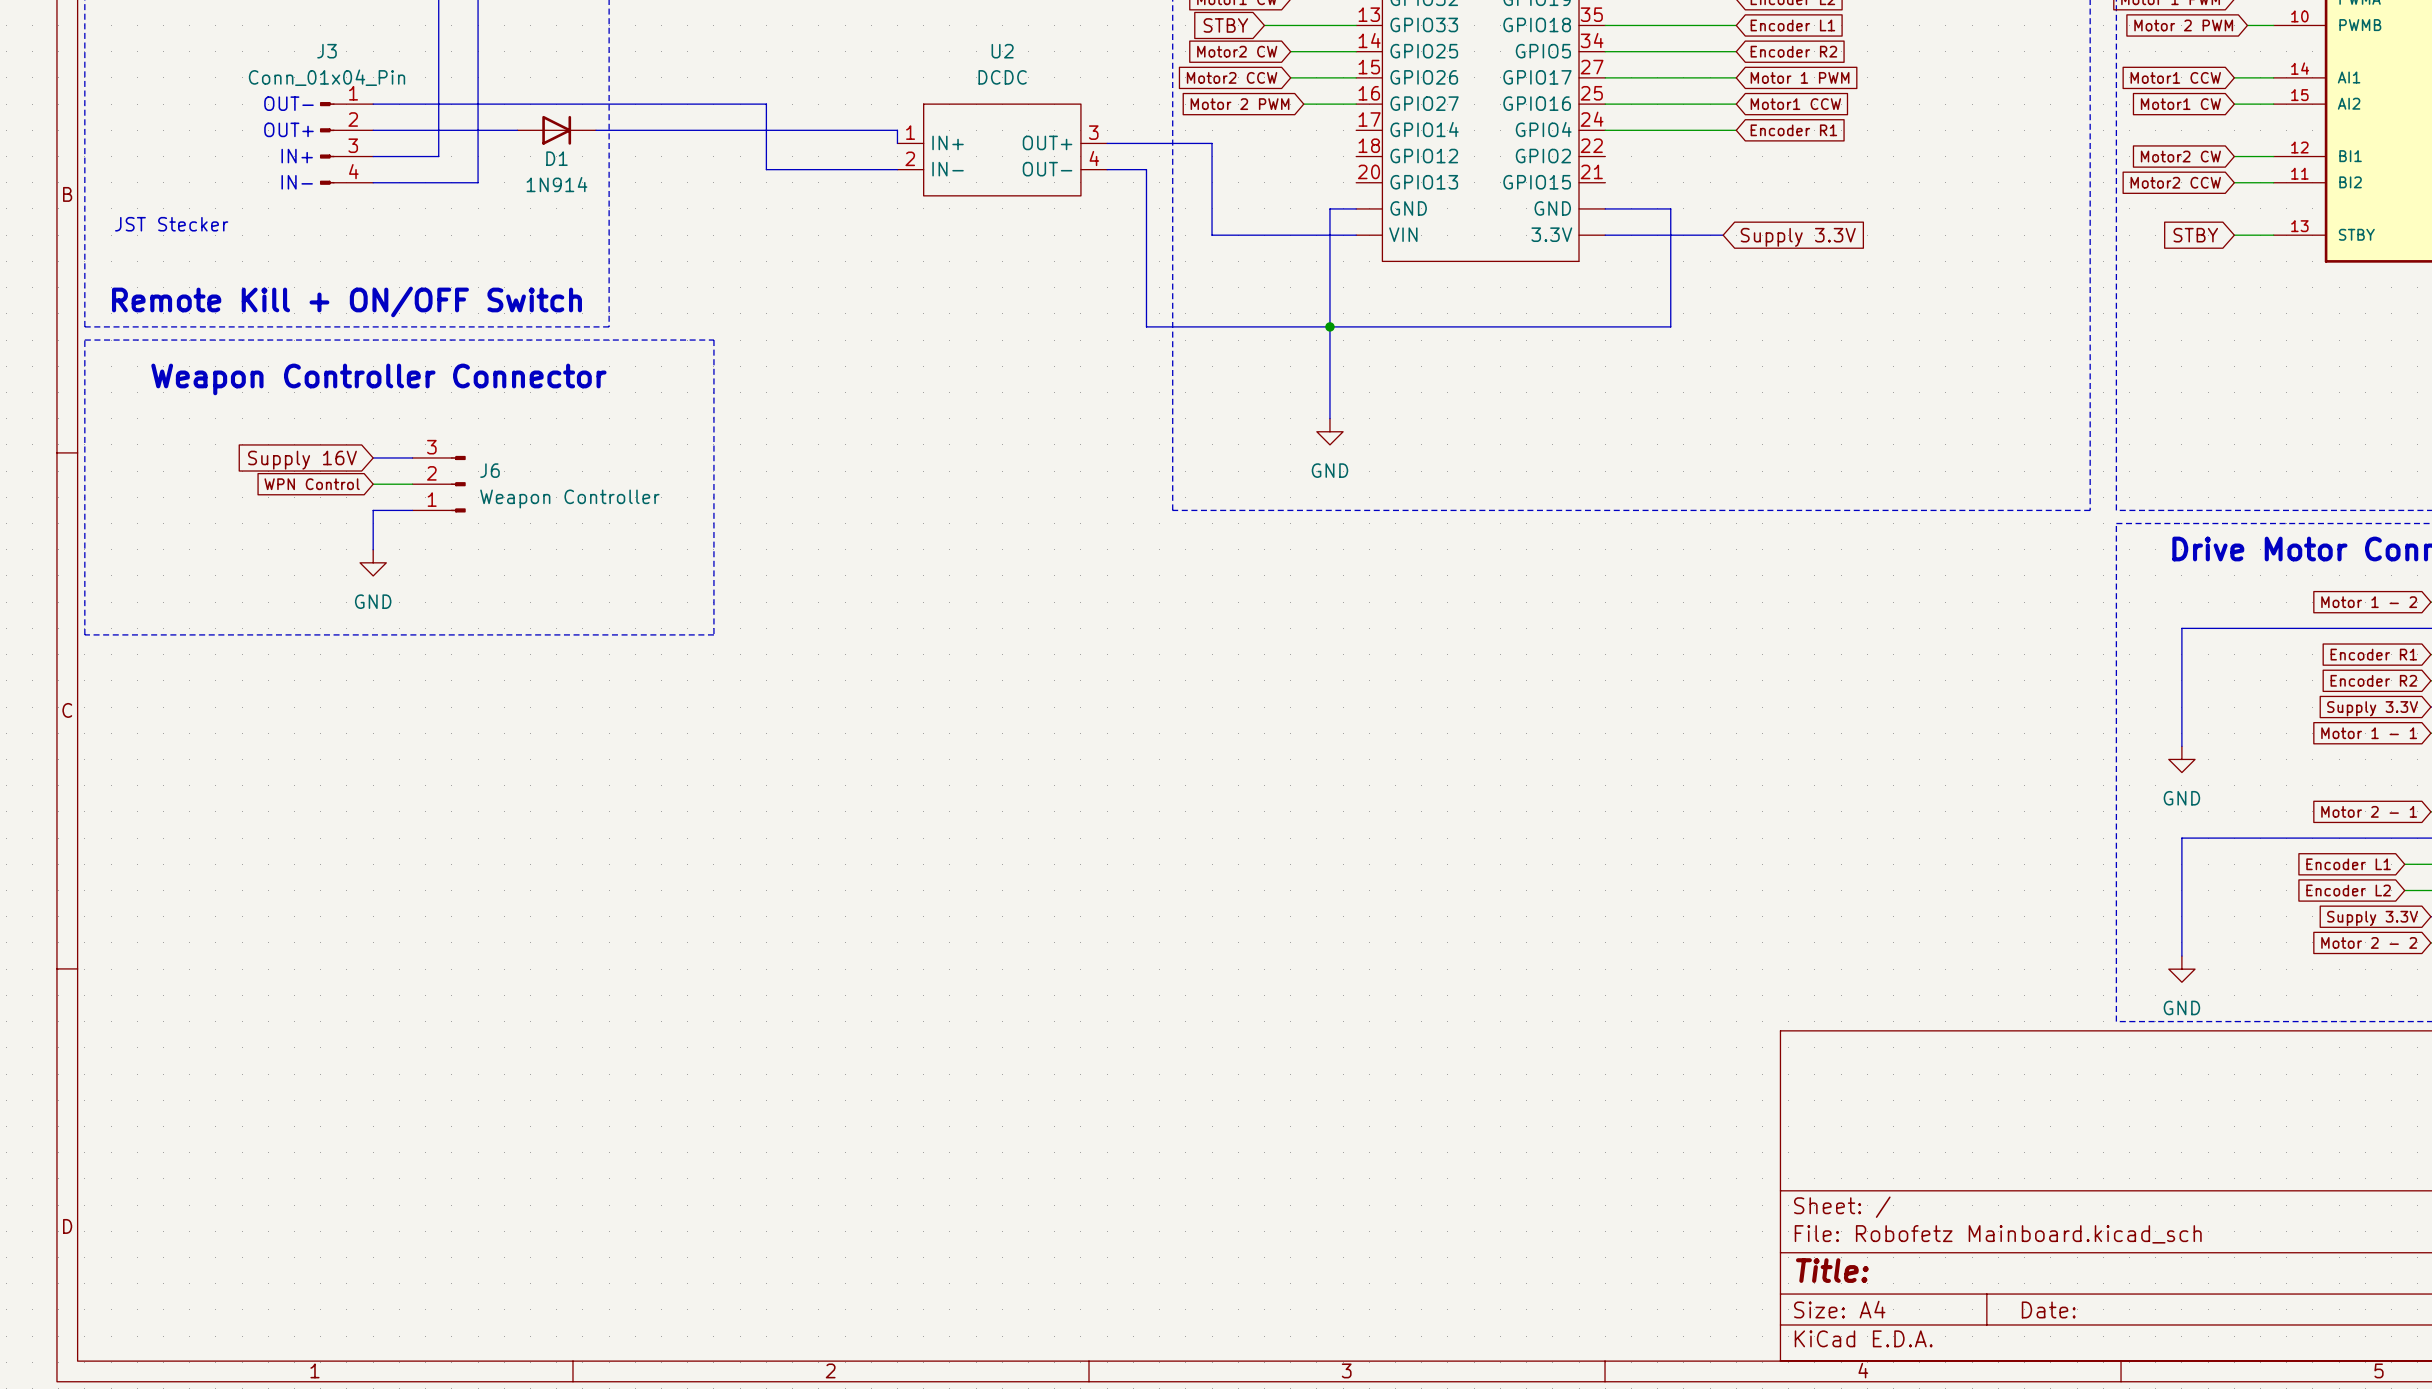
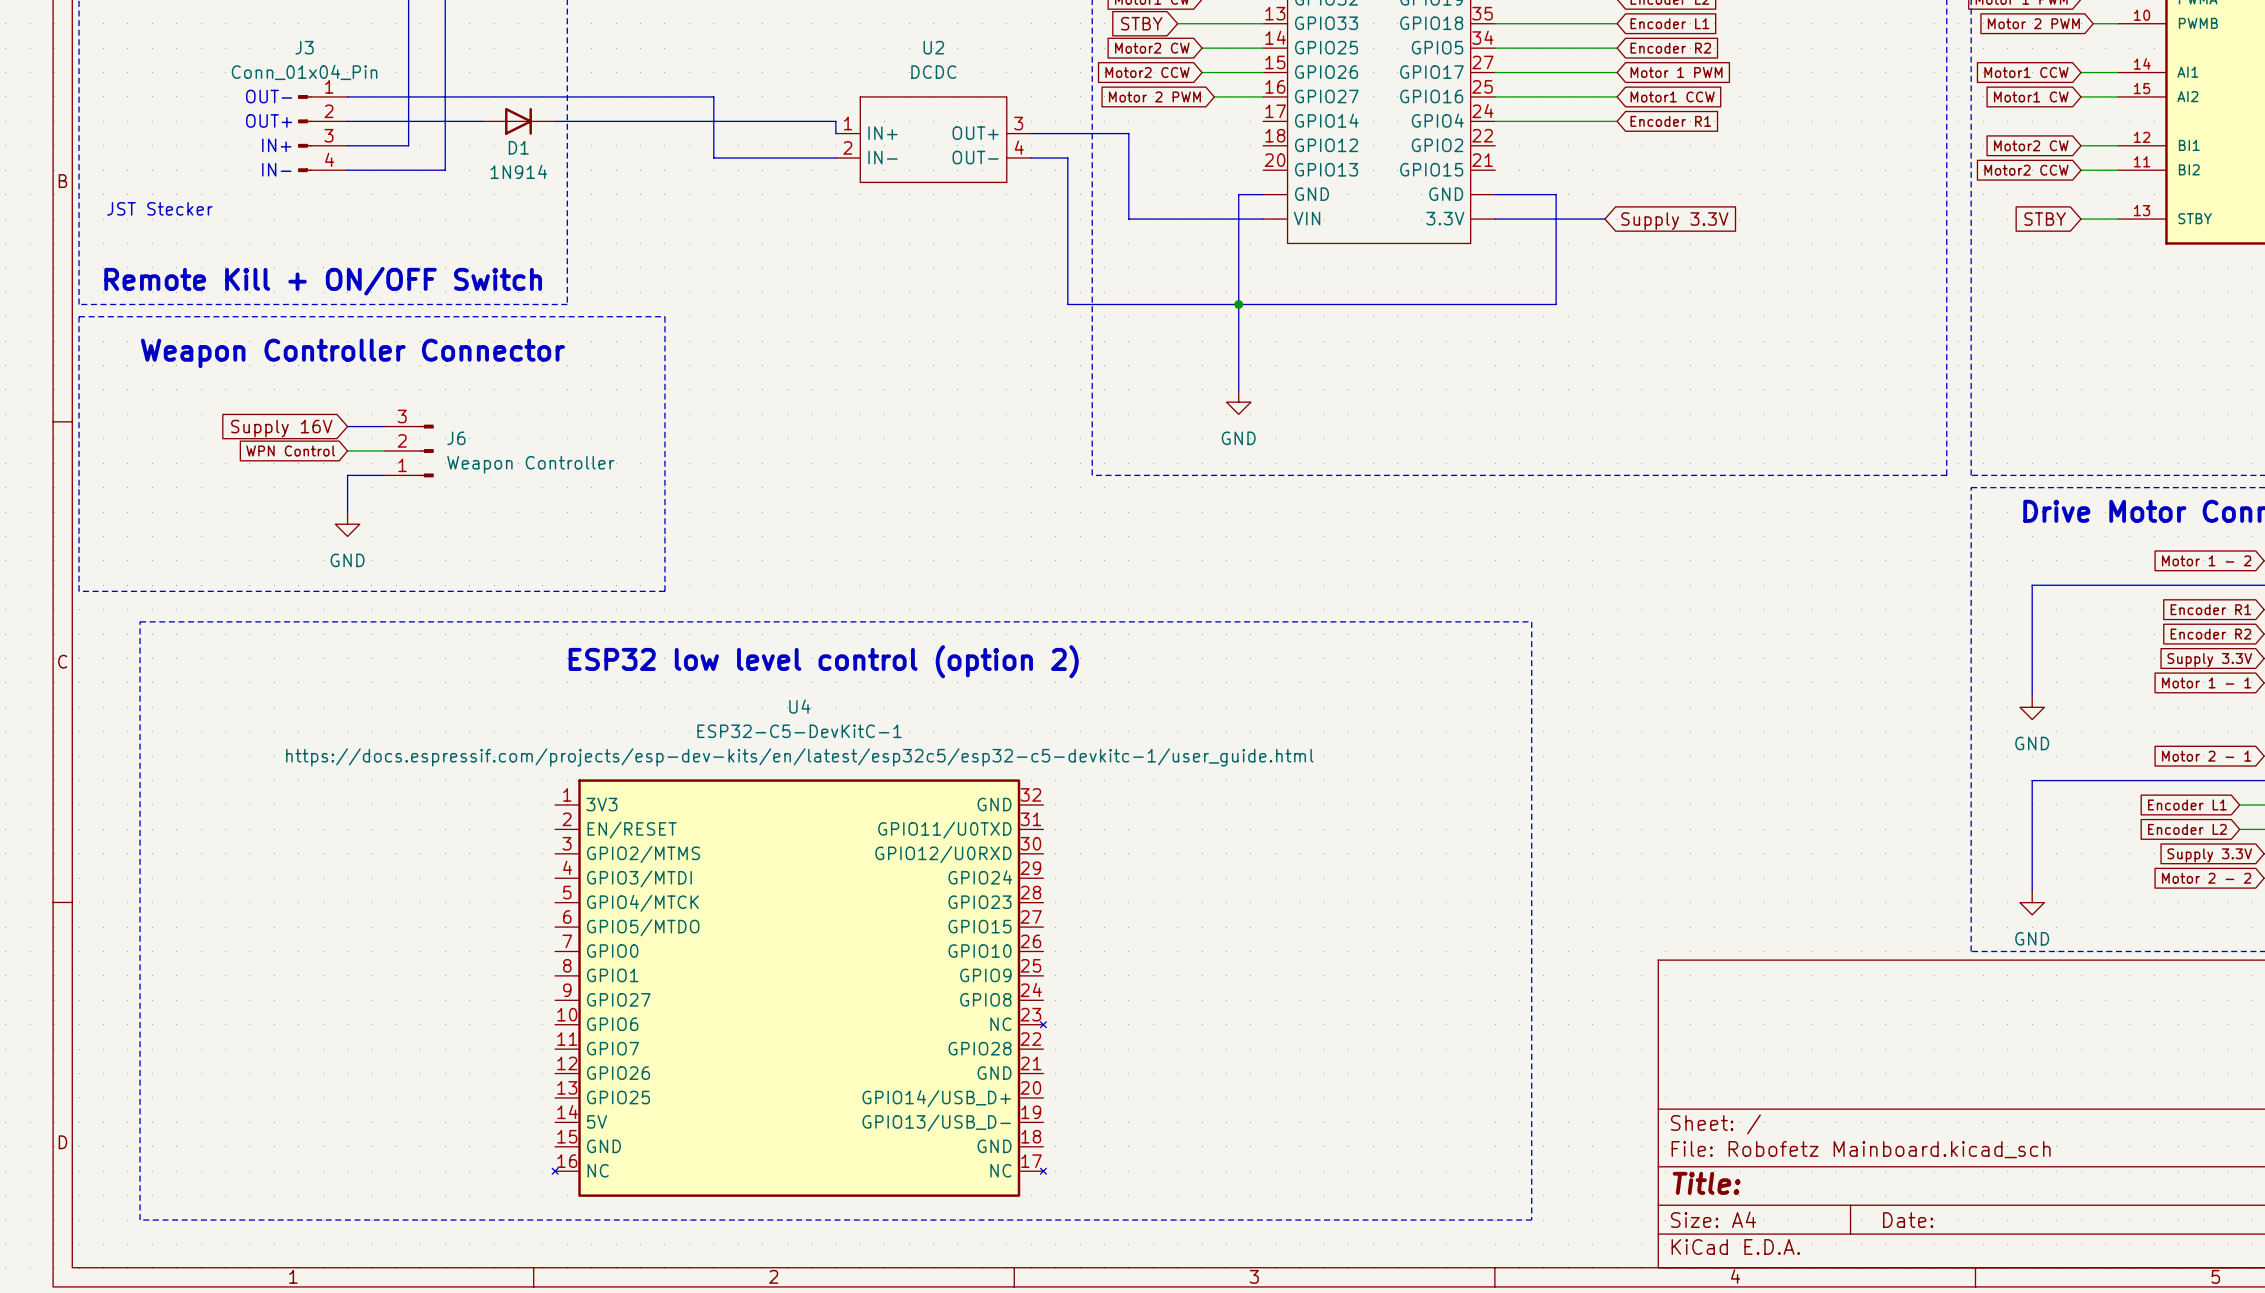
line: none -> (140, 621) (1531, 621) (1531, 1220) (140, 1220) (140, 621)
text: none -> ESP32 low level control (option 2) (823, 661)
U4: none -> ESP32-C5-DevKitC-1 (799, 988)

